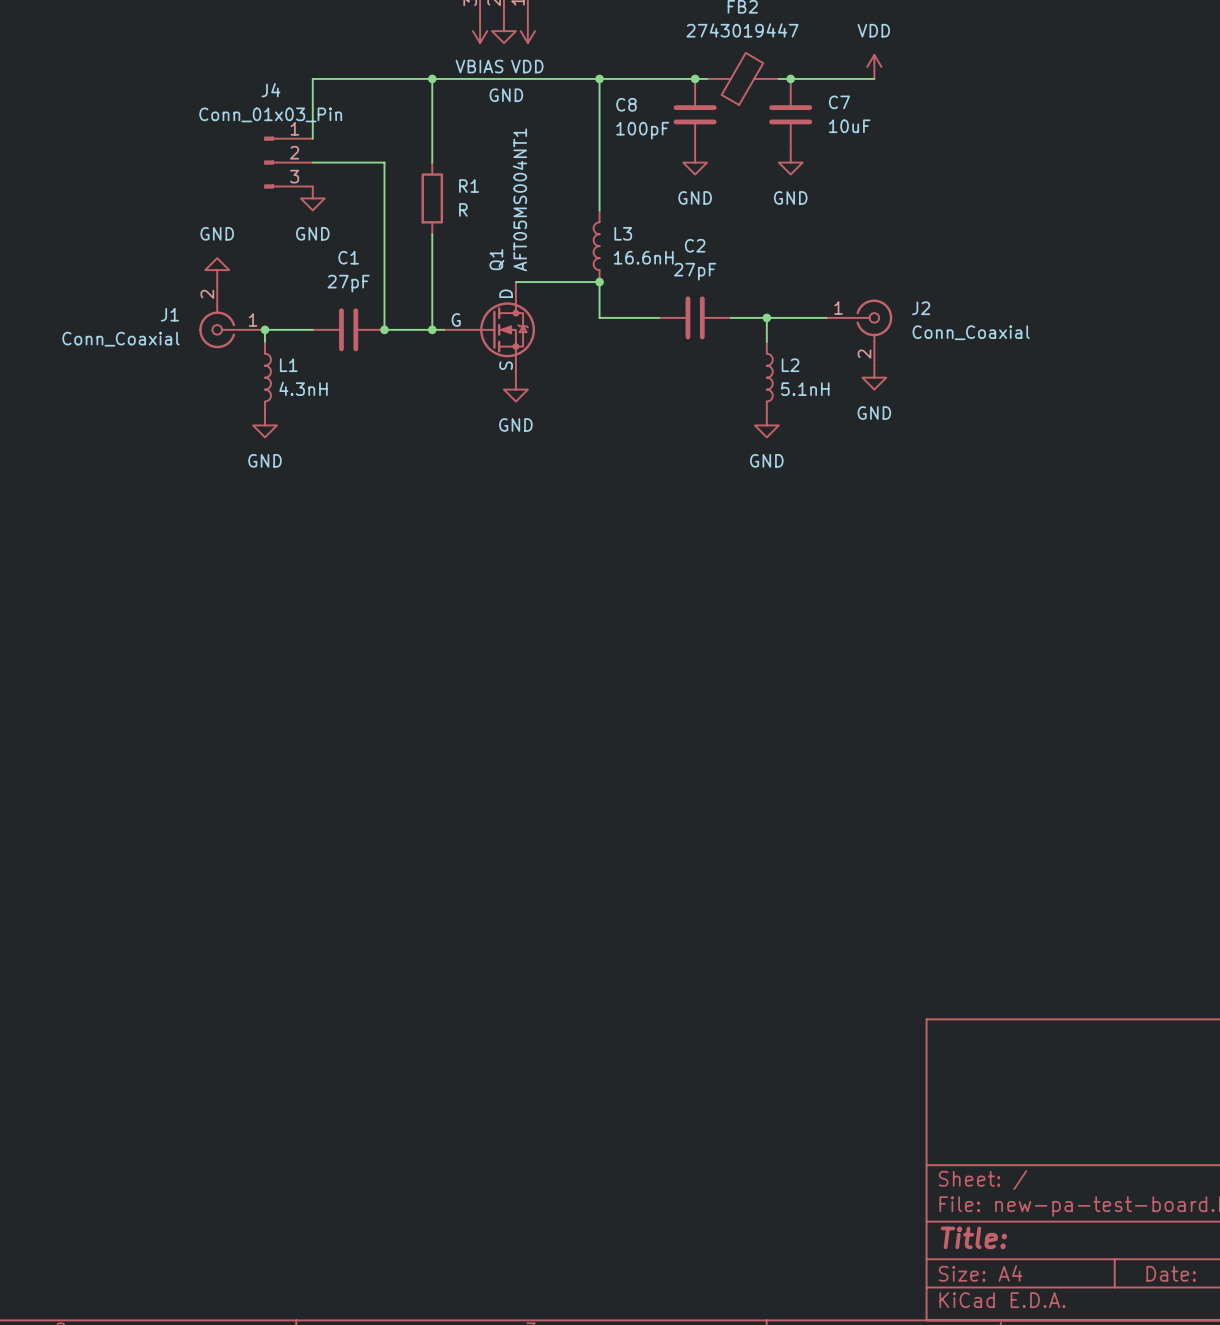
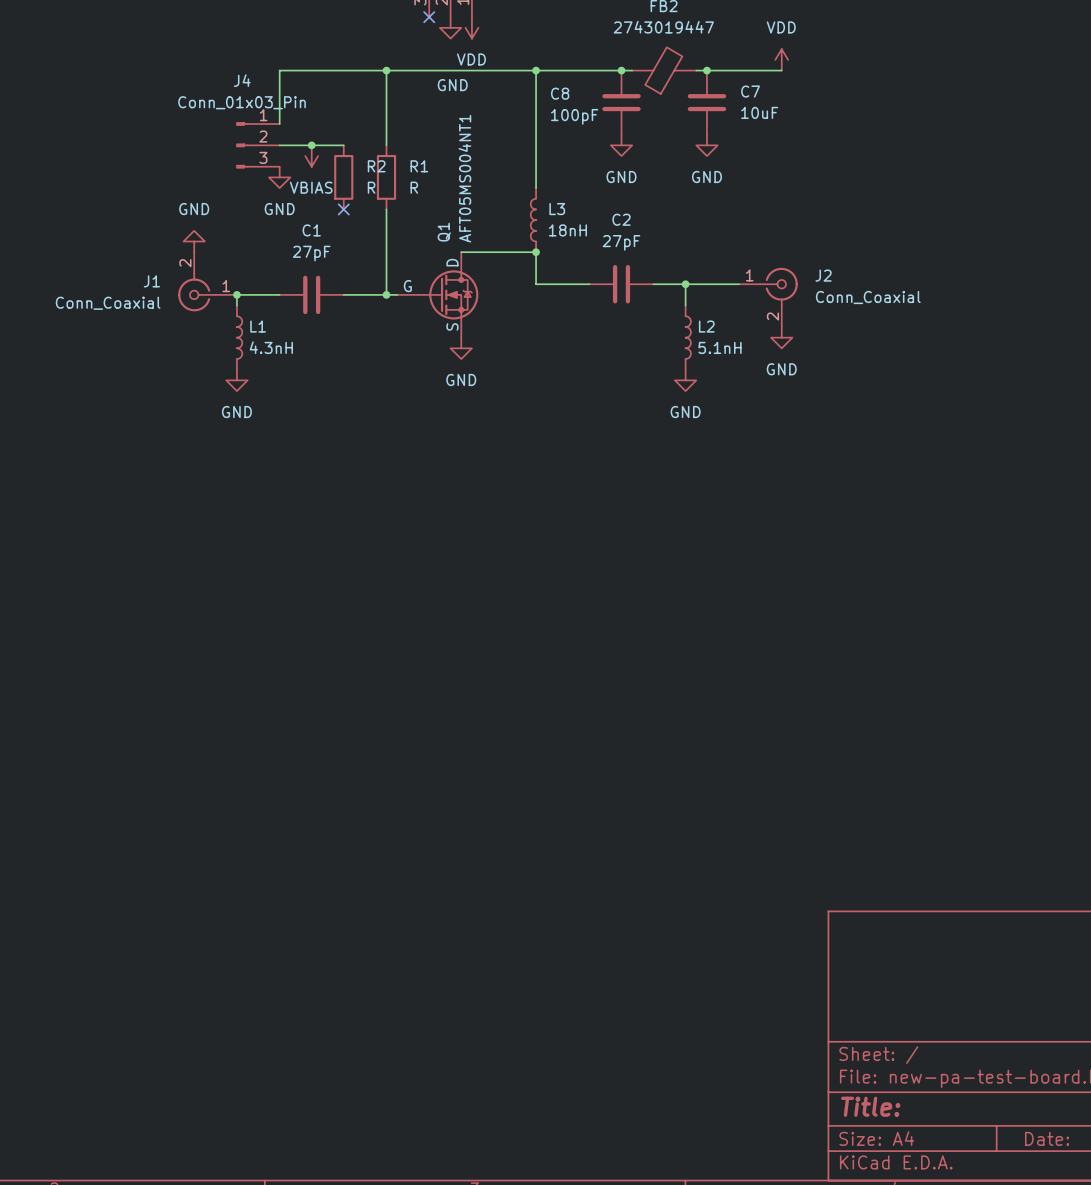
no-connect mark: none -> (429, 17)
power symbol position: VBIAS (480, 31) -> VBIAS (311, 156)
junction: none -> (311, 145)
wire: (384, 162) (384, 329) -> none
R2: none -> R (343, 177)
no-connect mark: none -> (343, 209)
L3 value: 16.6nH (643, 257) -> 18nH (567, 230)
junction: (384, 329) -> none

